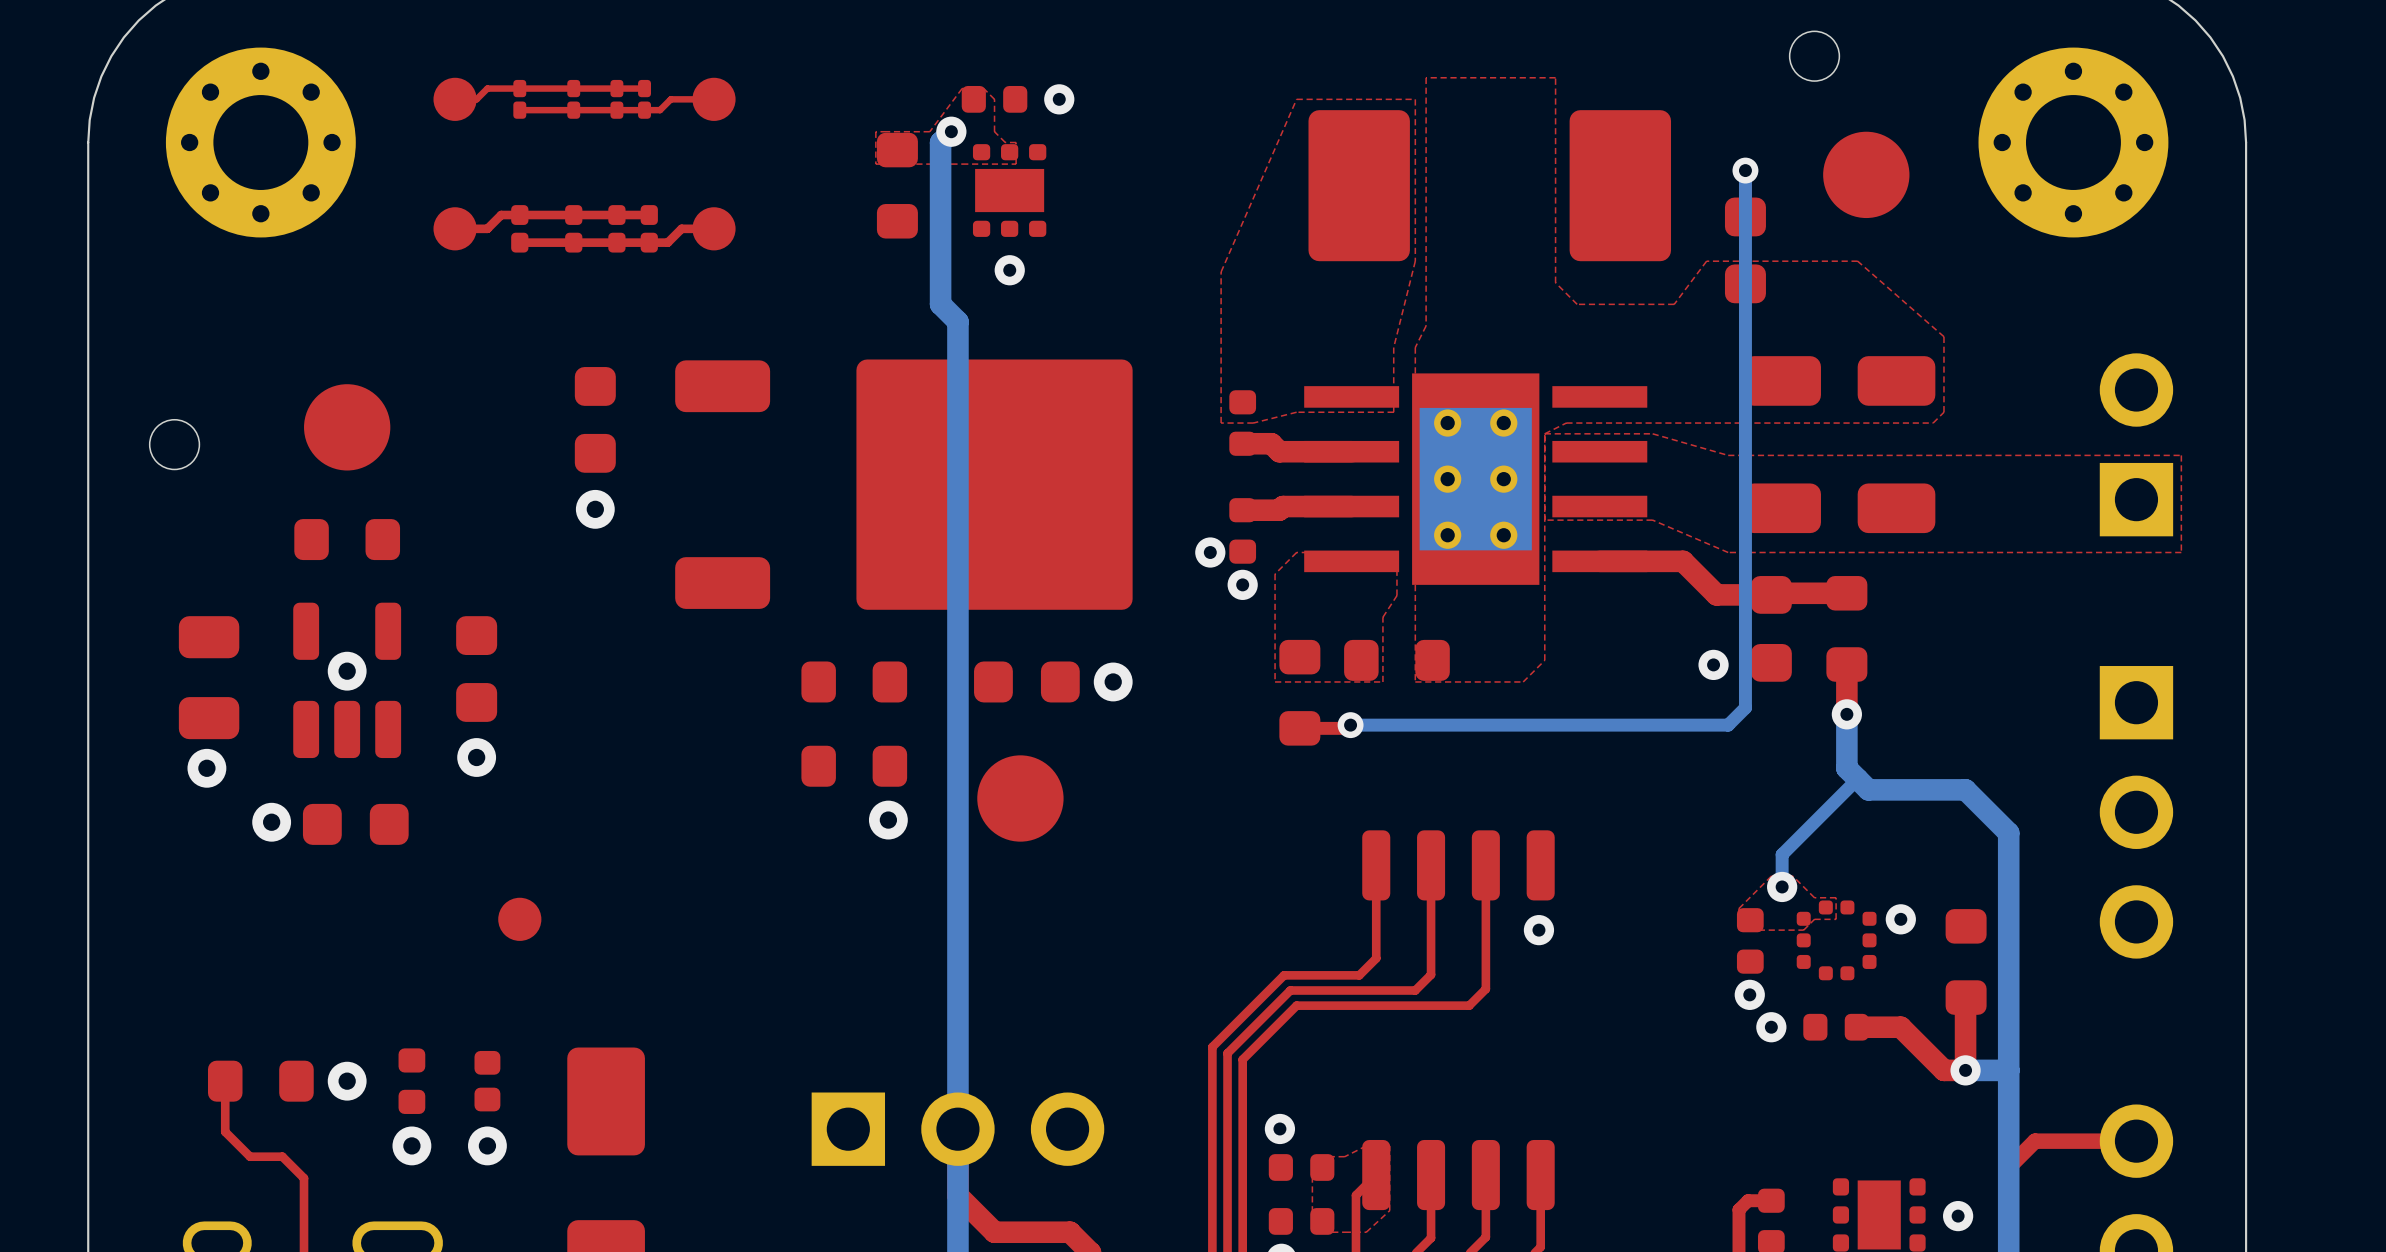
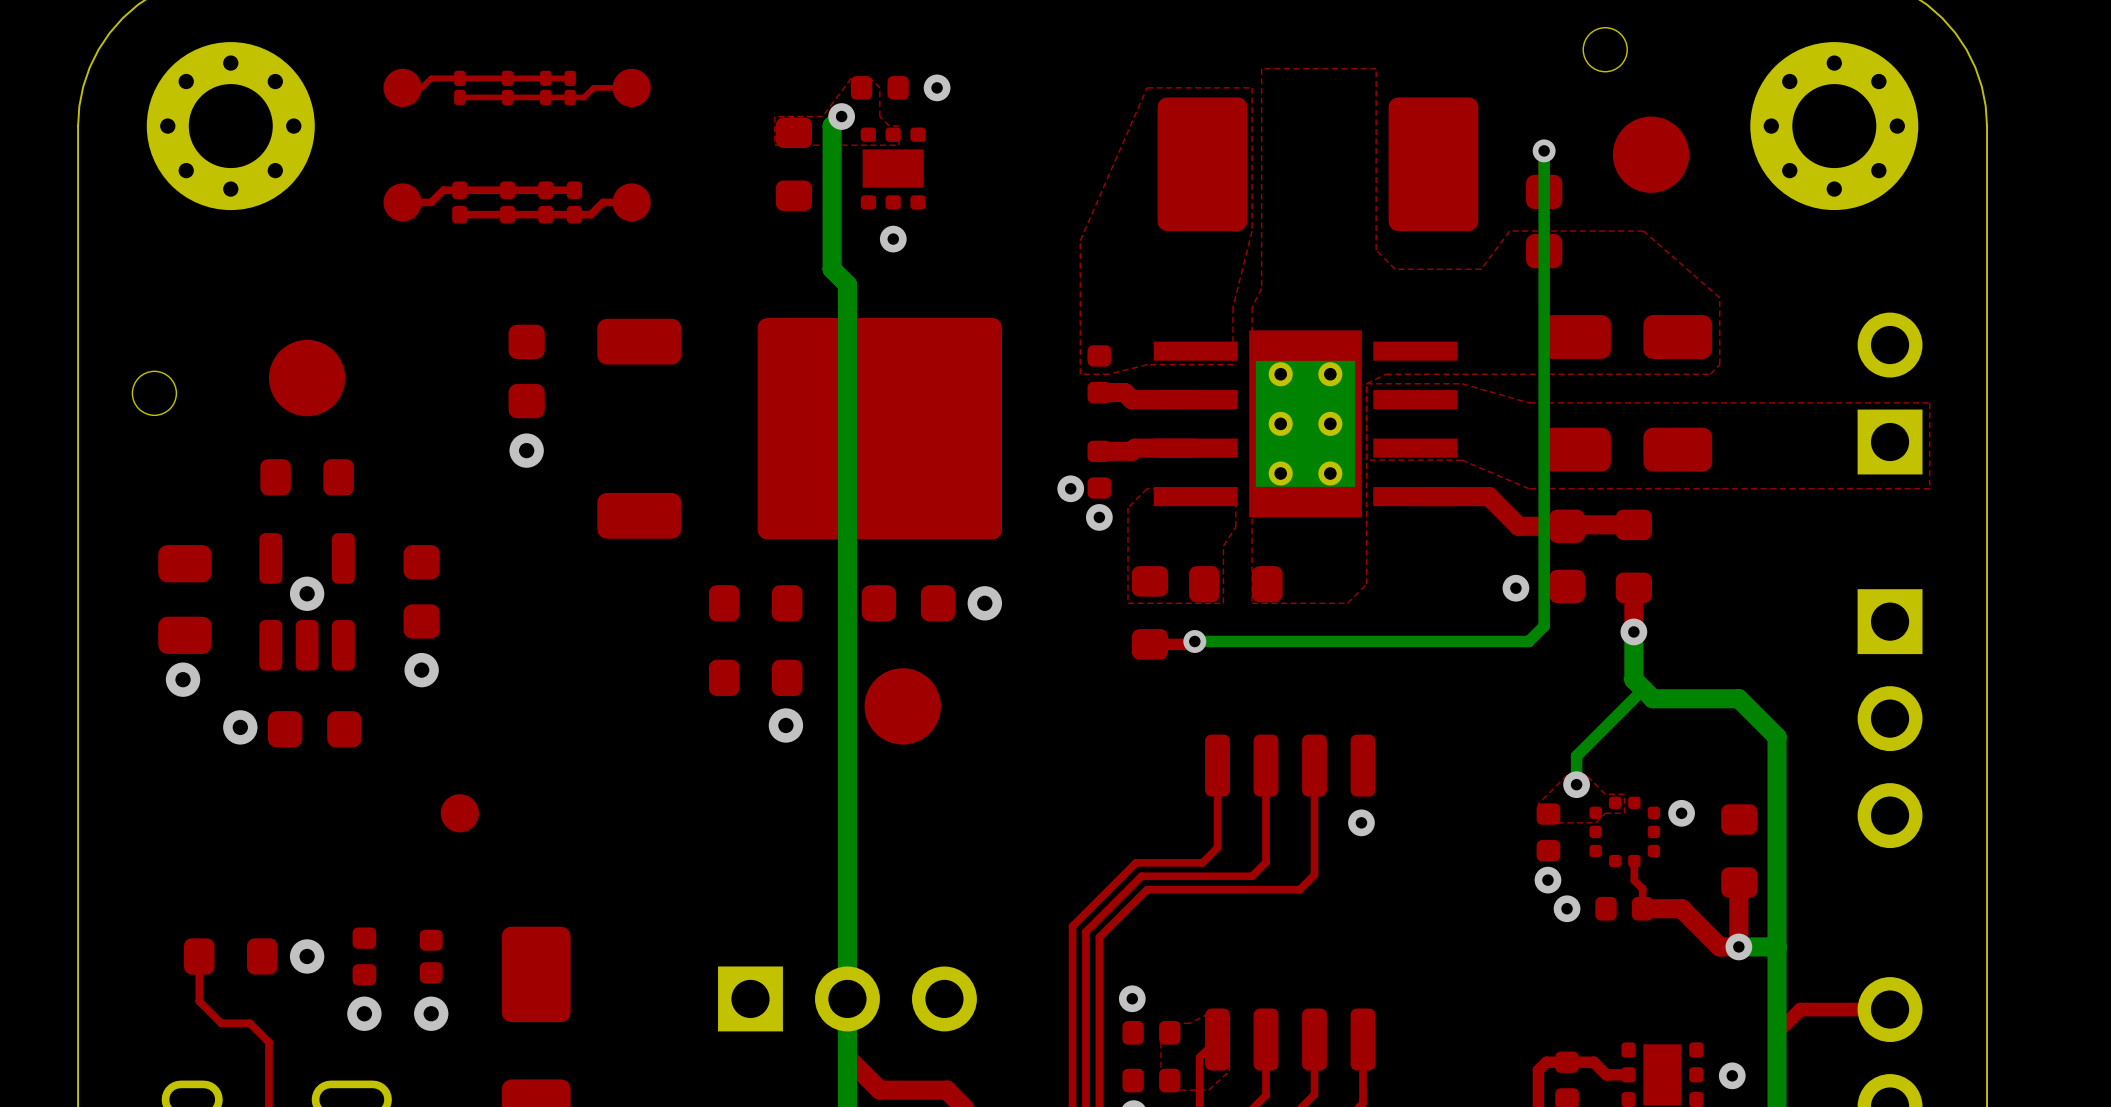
top track: none -> (1634, 861) (1634, 880) (1642, 888) (1642, 908)
top track: none -> (1567, 1062) (1593, 1062) (1606, 1074) (1628, 1074)

